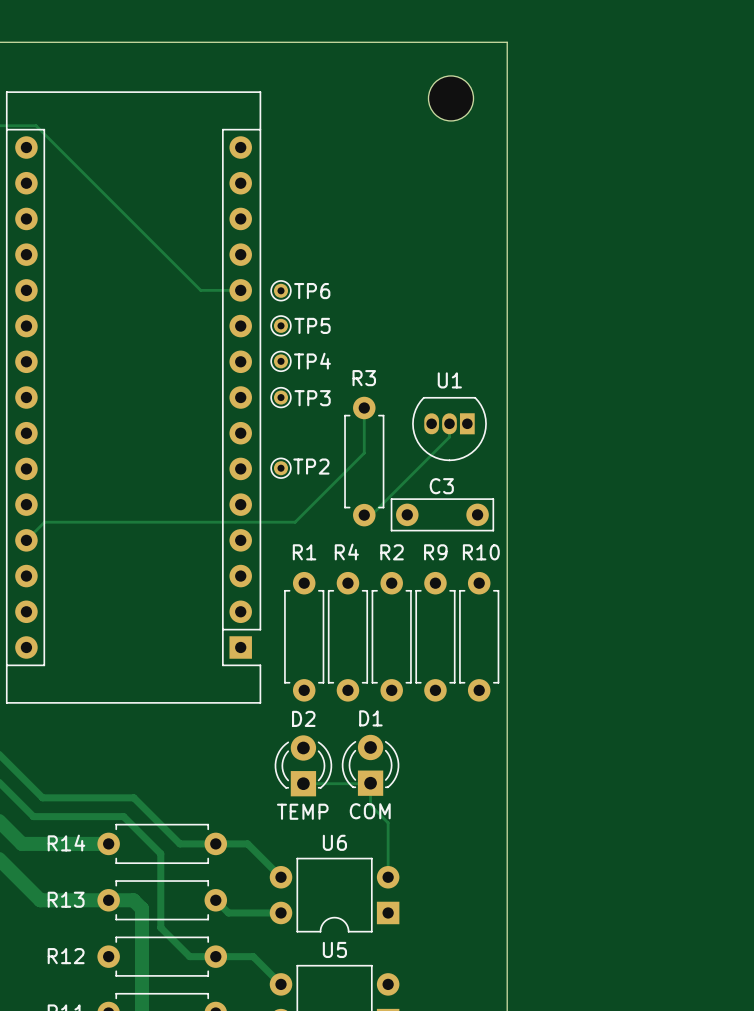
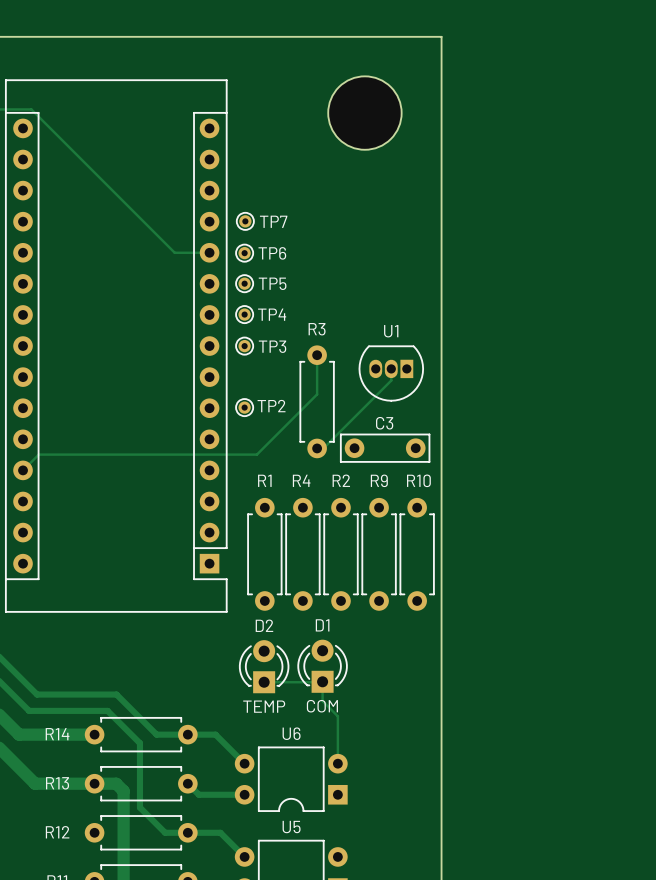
part: (451, 98) -> none
part: none -> (364, 113)
TP7: none -> (245, 221)

